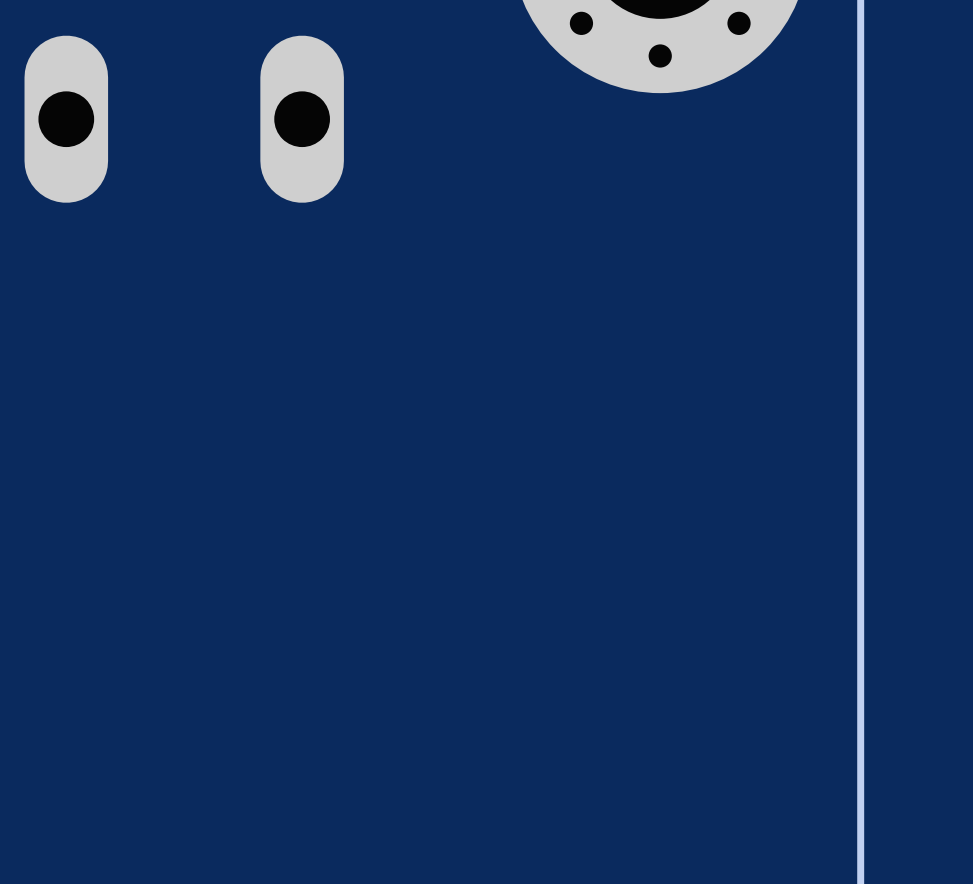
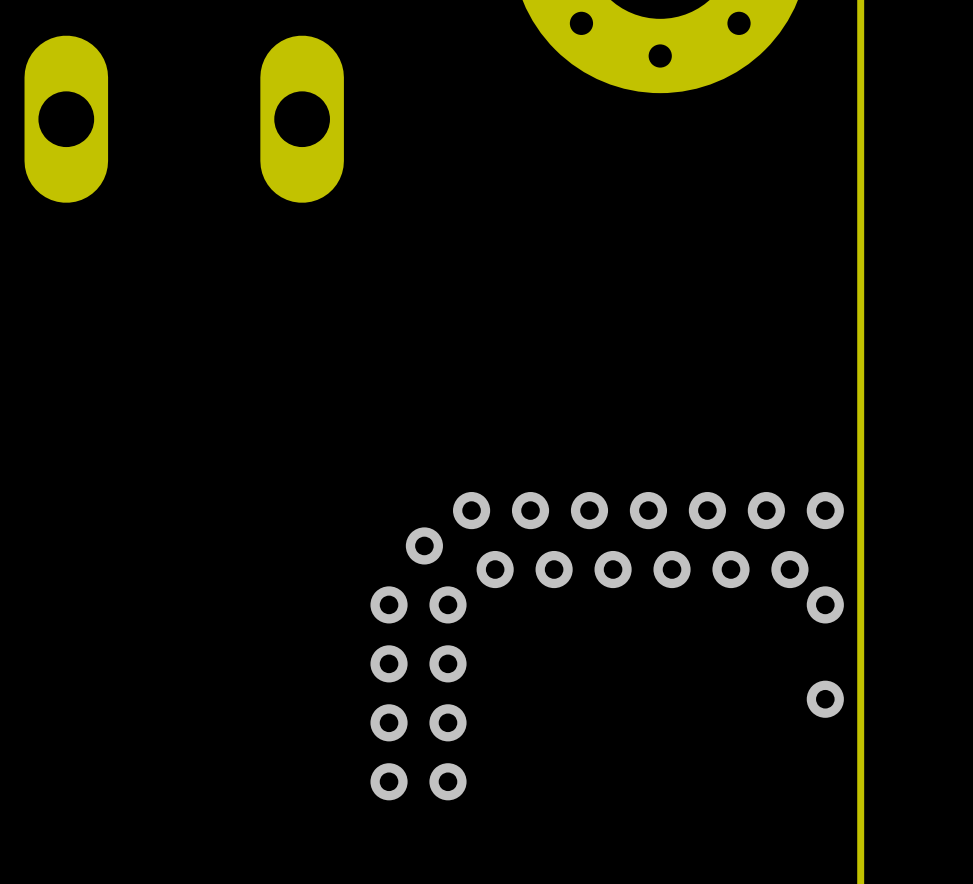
via: none -> (471, 510)
via: none -> (530, 510)
via: none -> (589, 510)
via: none -> (648, 510)
via: none -> (707, 510)
via: none -> (766, 510)
via: none -> (825, 510)
via: none -> (424, 545)
via: none -> (495, 569)
via: none -> (554, 569)
via: none -> (613, 569)
via: none -> (672, 569)
via: none -> (730, 569)
via: none -> (789, 569)
via: none -> (389, 604)
via: none -> (447, 604)
via: none -> (825, 604)
via: none -> (389, 663)
via: none -> (447, 663)
via: none -> (825, 699)
via: none -> (389, 722)
via: none -> (447, 722)
via: none -> (389, 781)
via: none -> (447, 781)

